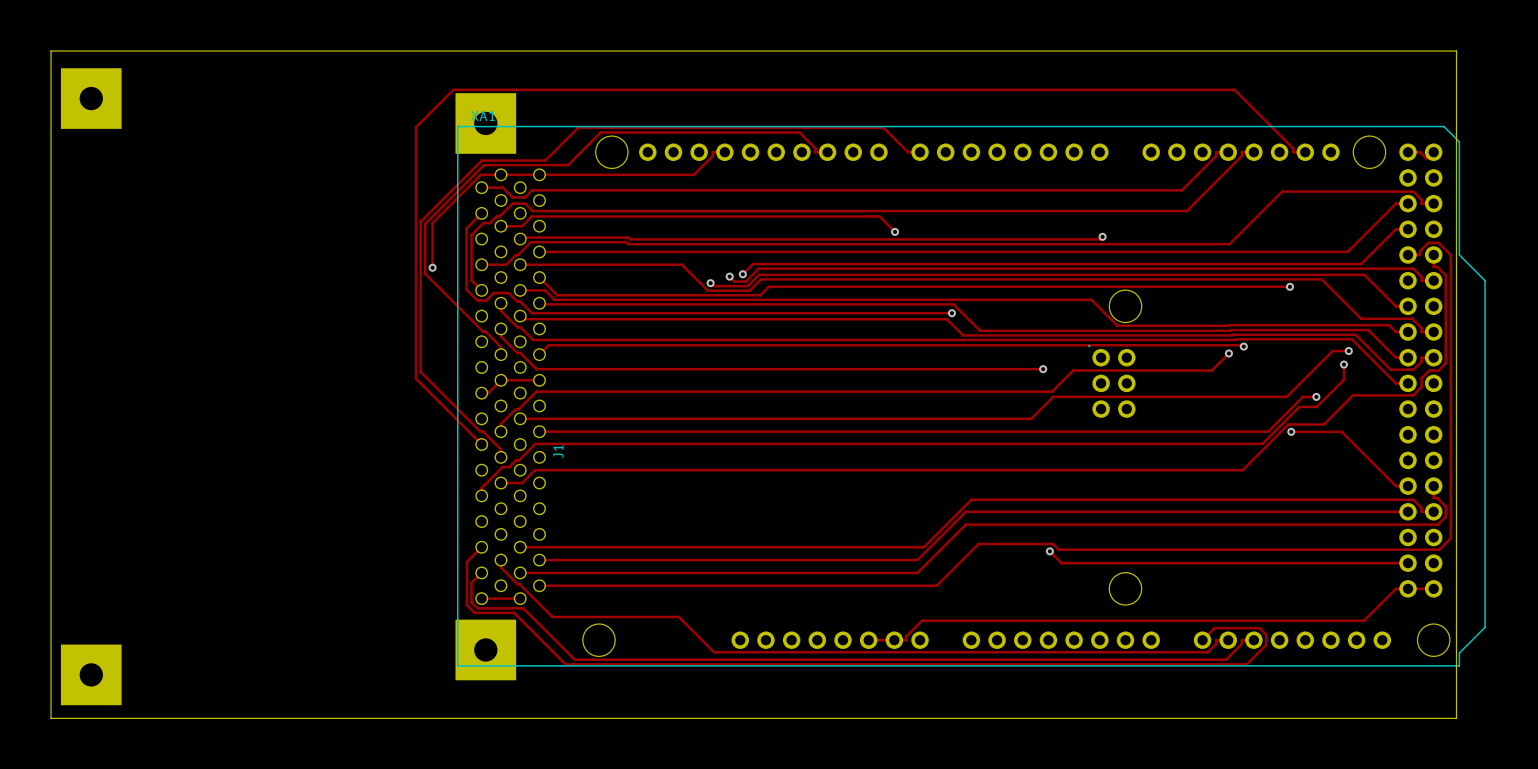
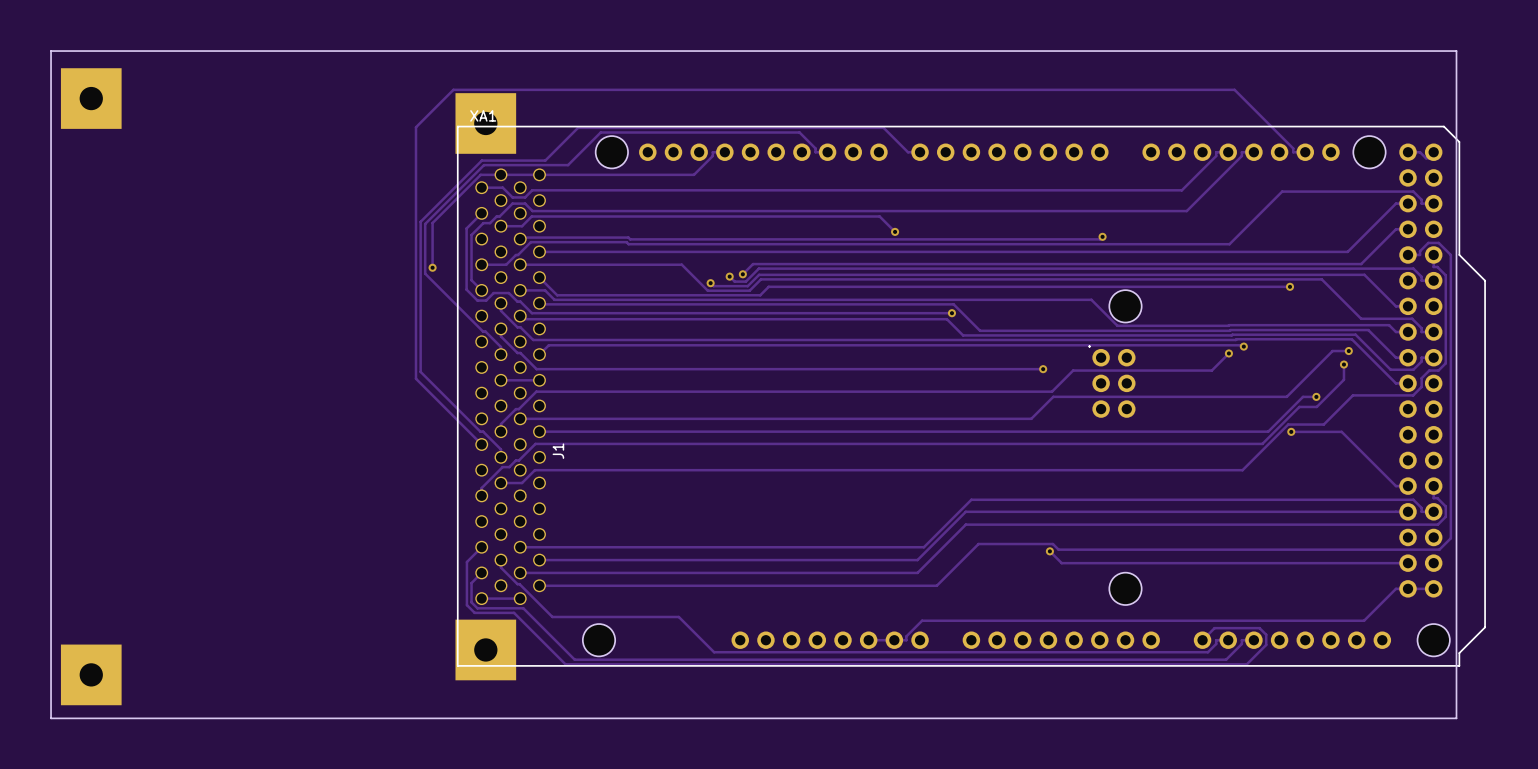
track: (500, 380) (488, 393) (481, 393) -> none

